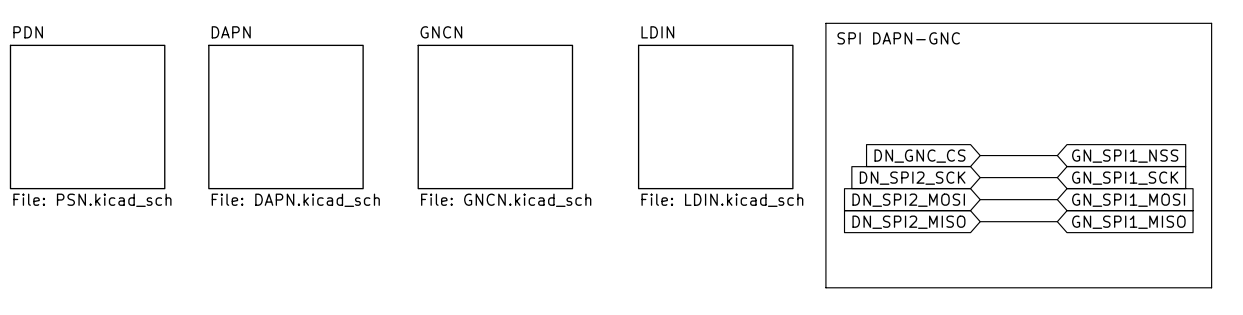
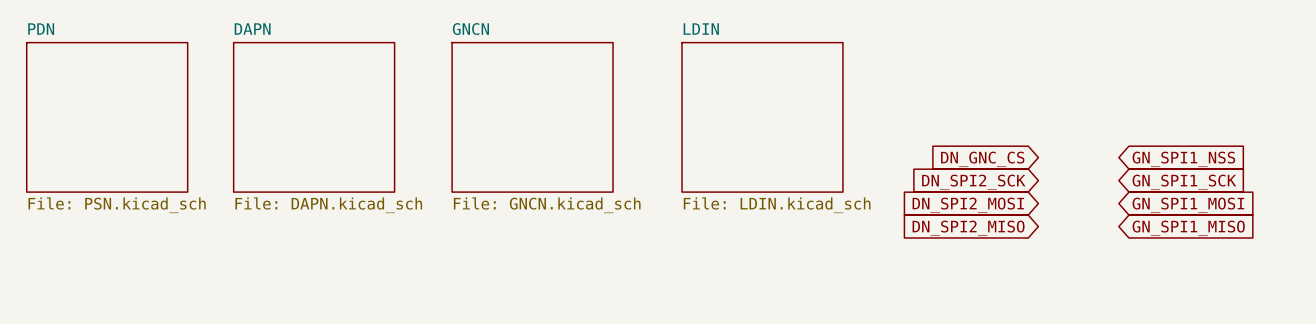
line: (825, 23) (1211, 23) (1211, 287) (825, 287) (825, 23) -> none
text: SPI DAPN-GNC (898, 38) -> none
wire: (980, 155) (1057, 155) -> none
wire: (980, 177) (1057, 177) -> none
wire: (980, 199) (1057, 199) -> none
wire: (980, 221) (1057, 221) -> none

